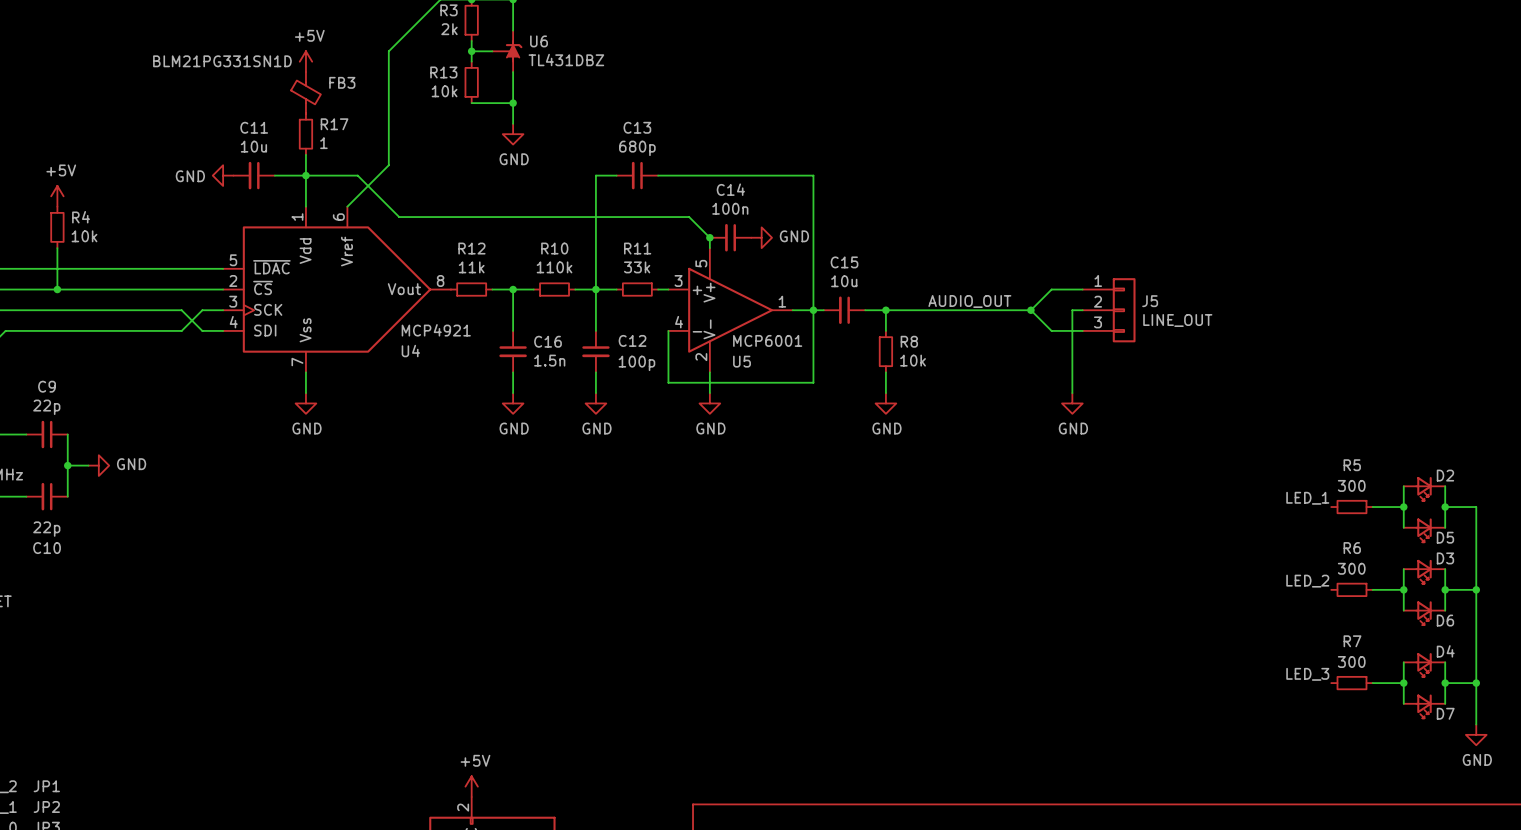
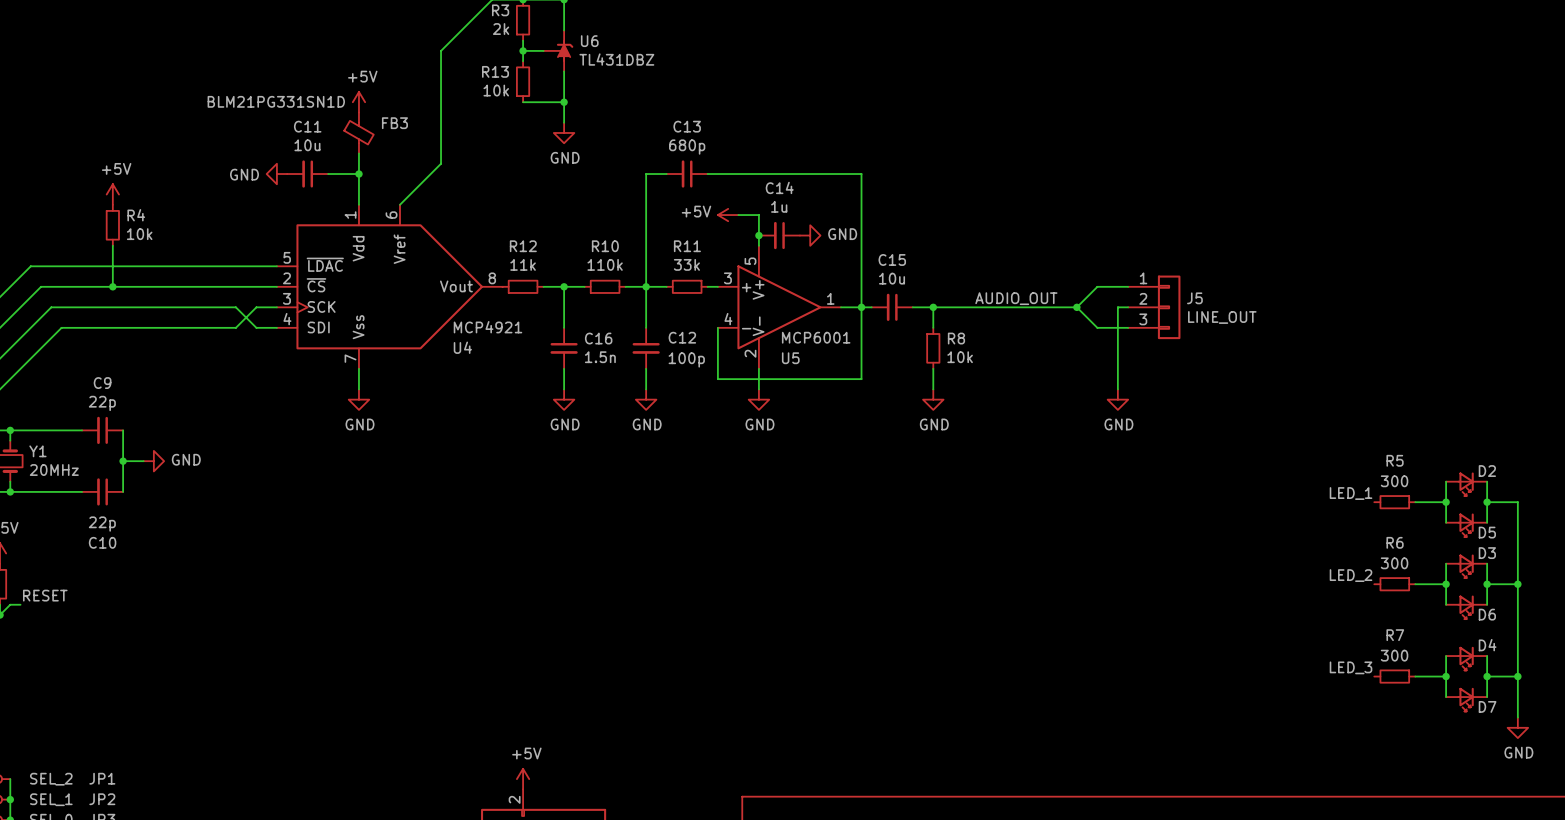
power symbol position: +5V (305, 61) -> +5V (358, 102)
FB3 position: (305, 92) -> (358, 132)
R17: 1 (305, 134) -> none
wire: (305, 175) (357, 175) (399, 217) (689, 217) (709, 237) -> (738, 215) (758, 215) (758, 235)
C14 value: 100n (730, 208) -> 1u (779, 206)
power symbol: none -> +5V (728, 215)

